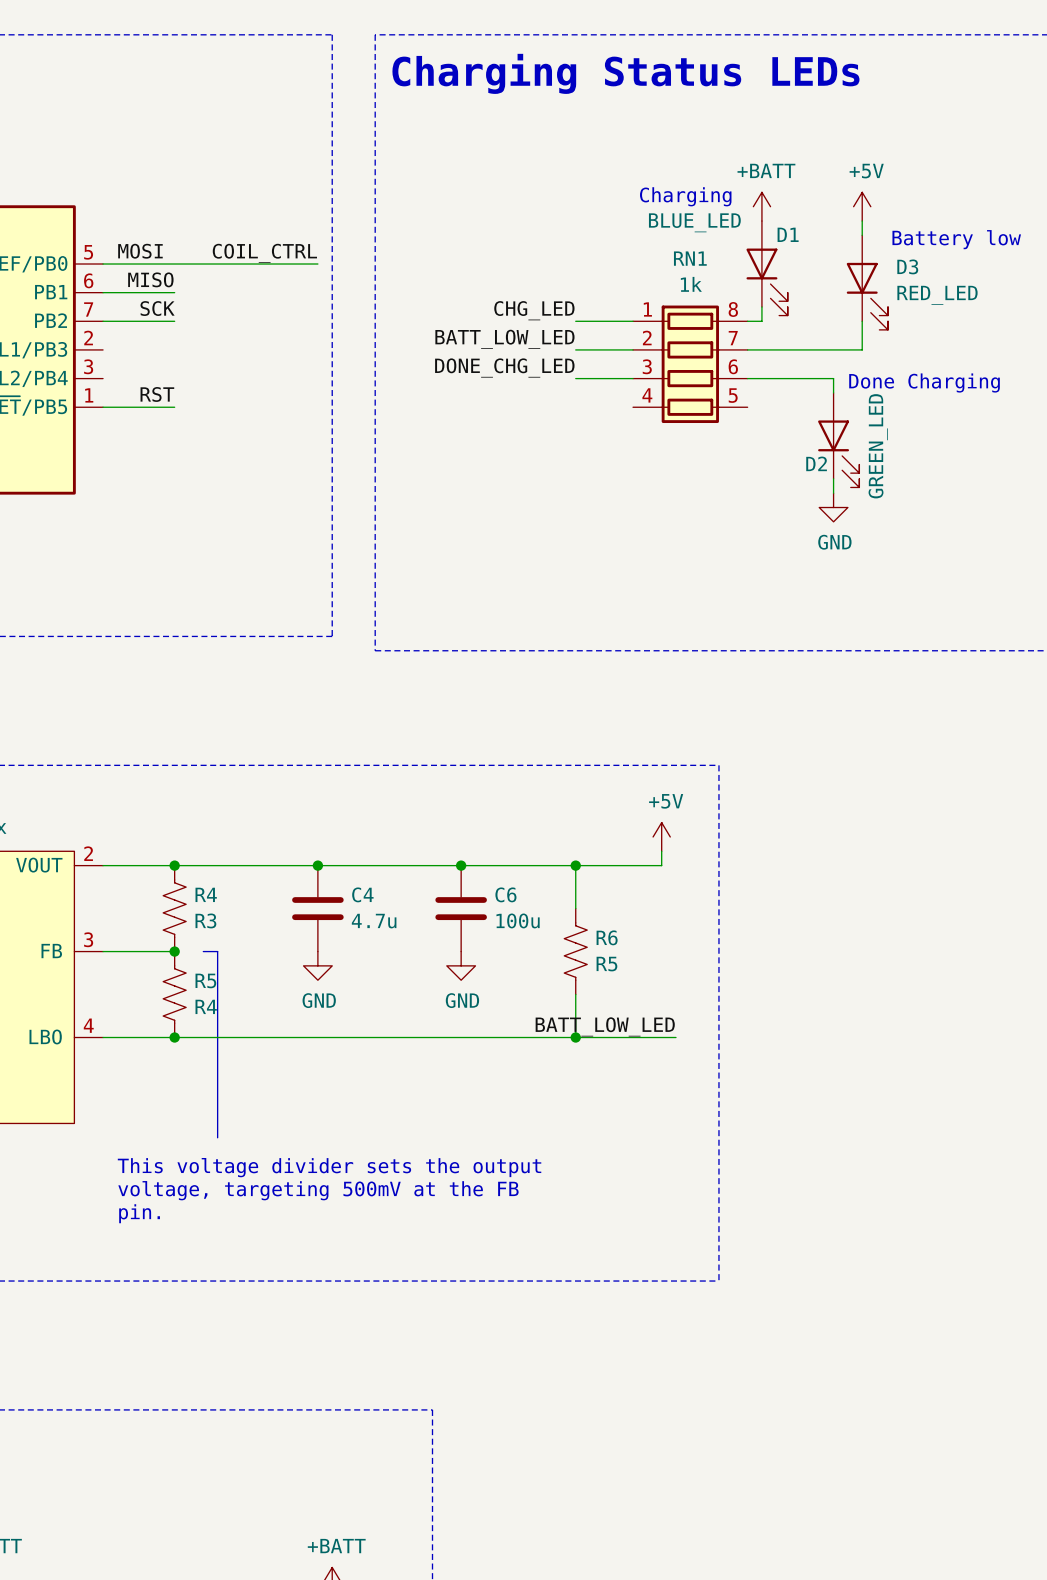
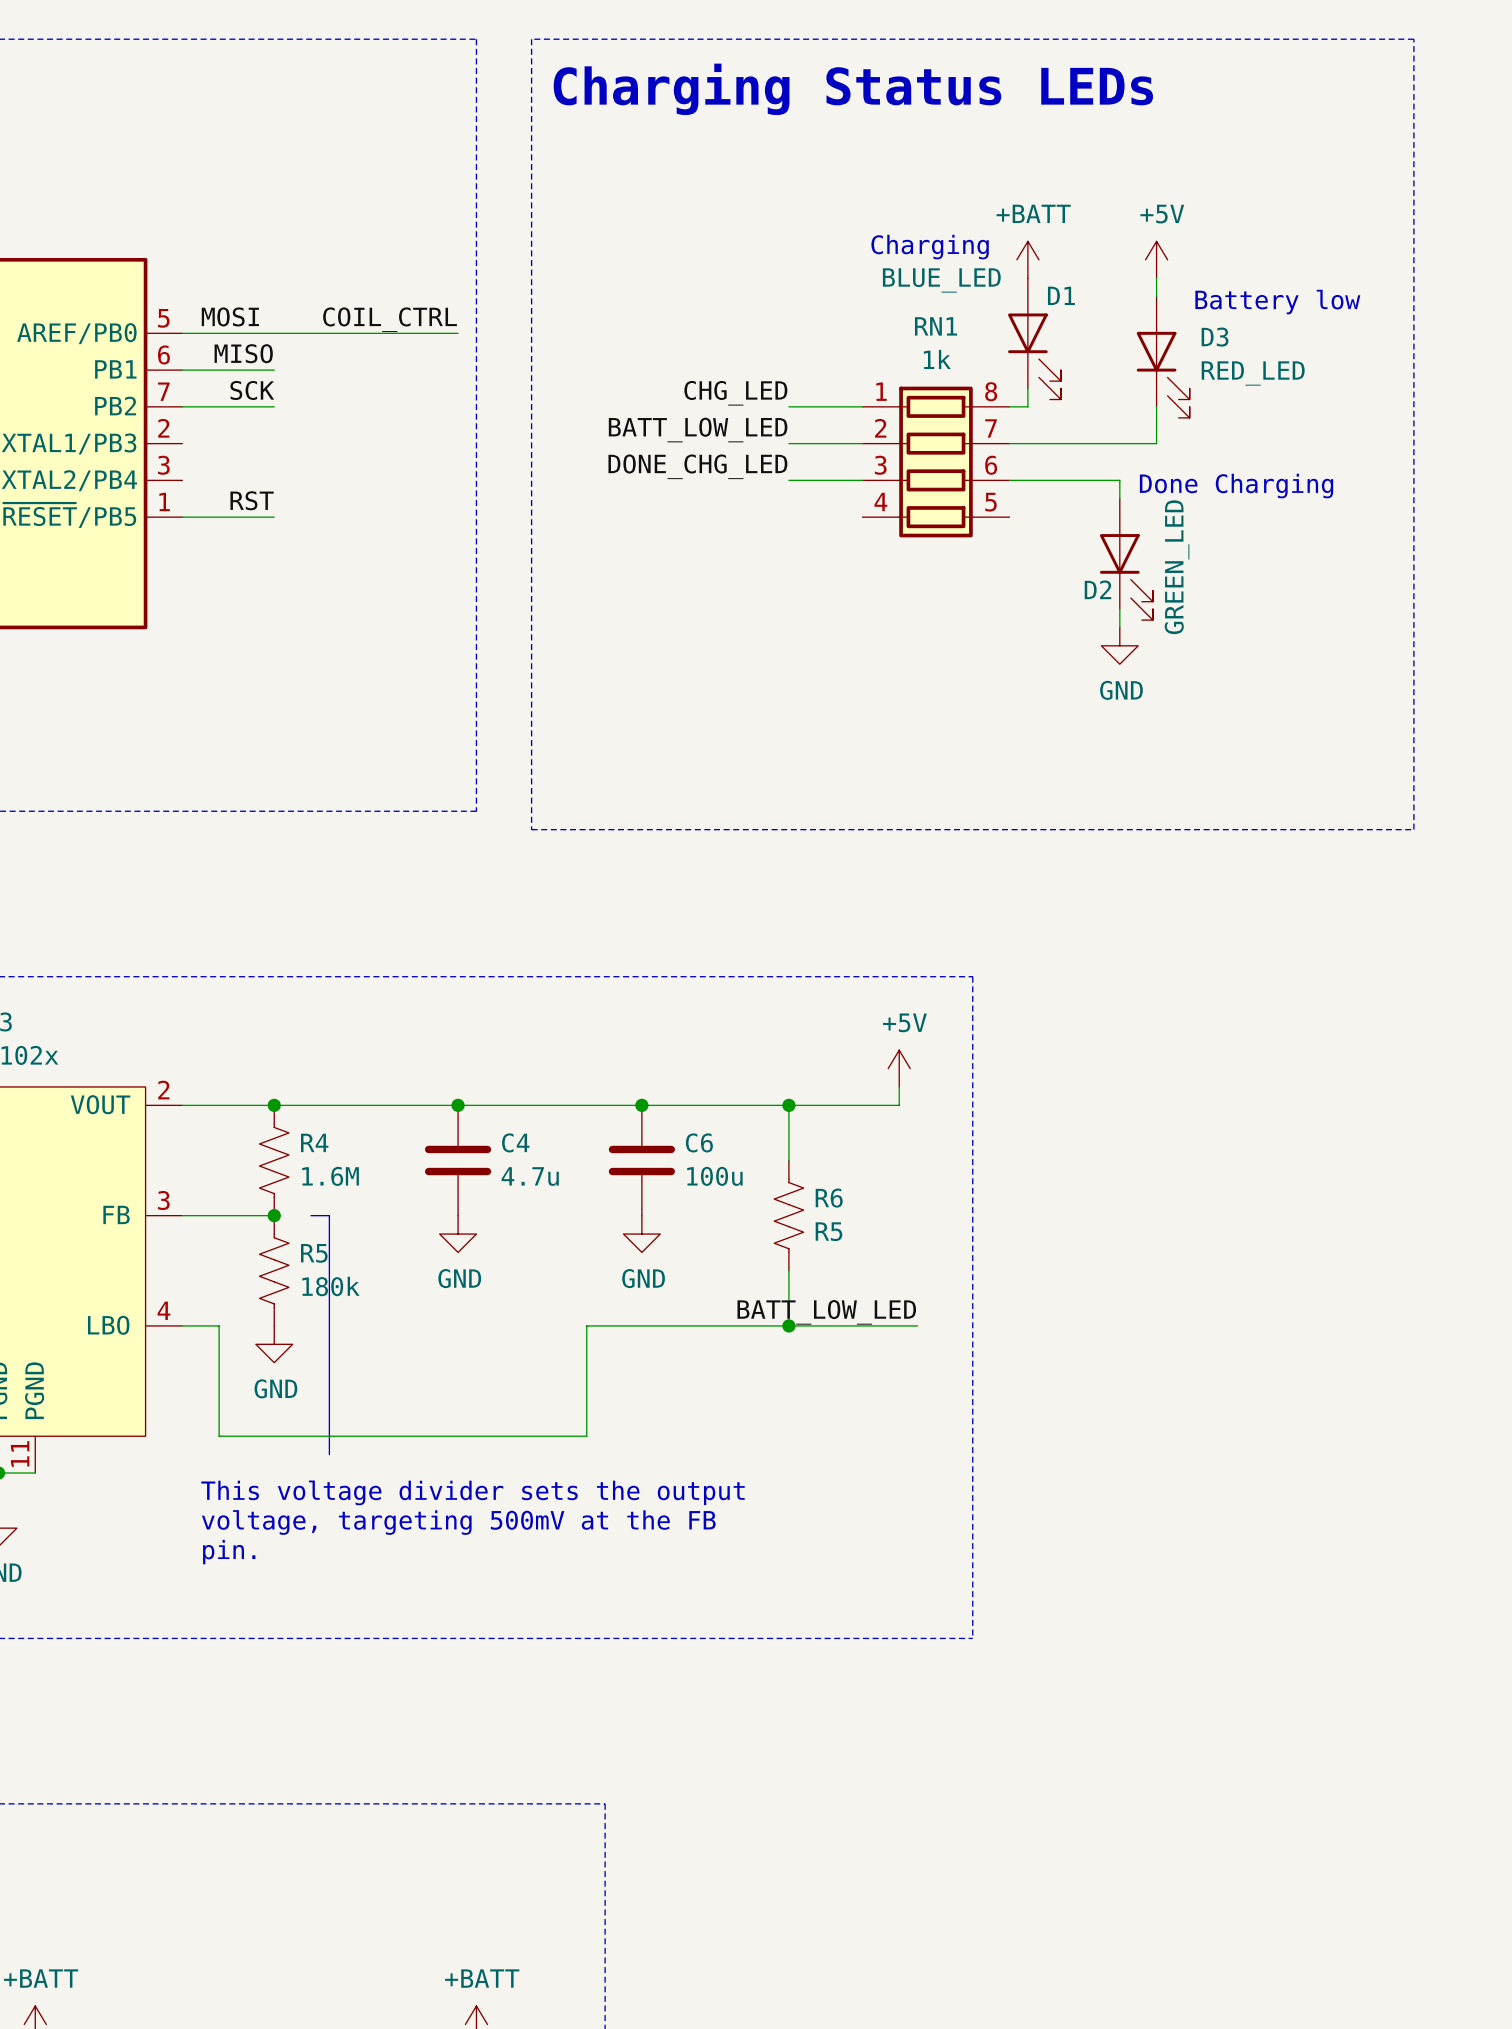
R4 value: R3 (205, 920) -> 1.6M (330, 1176)
R5 value: R4 (206, 1006) -> 180k (330, 1286)
wire: (131, 1037) (418, 1037) -> (219, 1325) (219, 1436) (586, 1436) (586, 1325)
junction: (174, 1037) -> none
power symbol: none -> GND (274, 1344)

